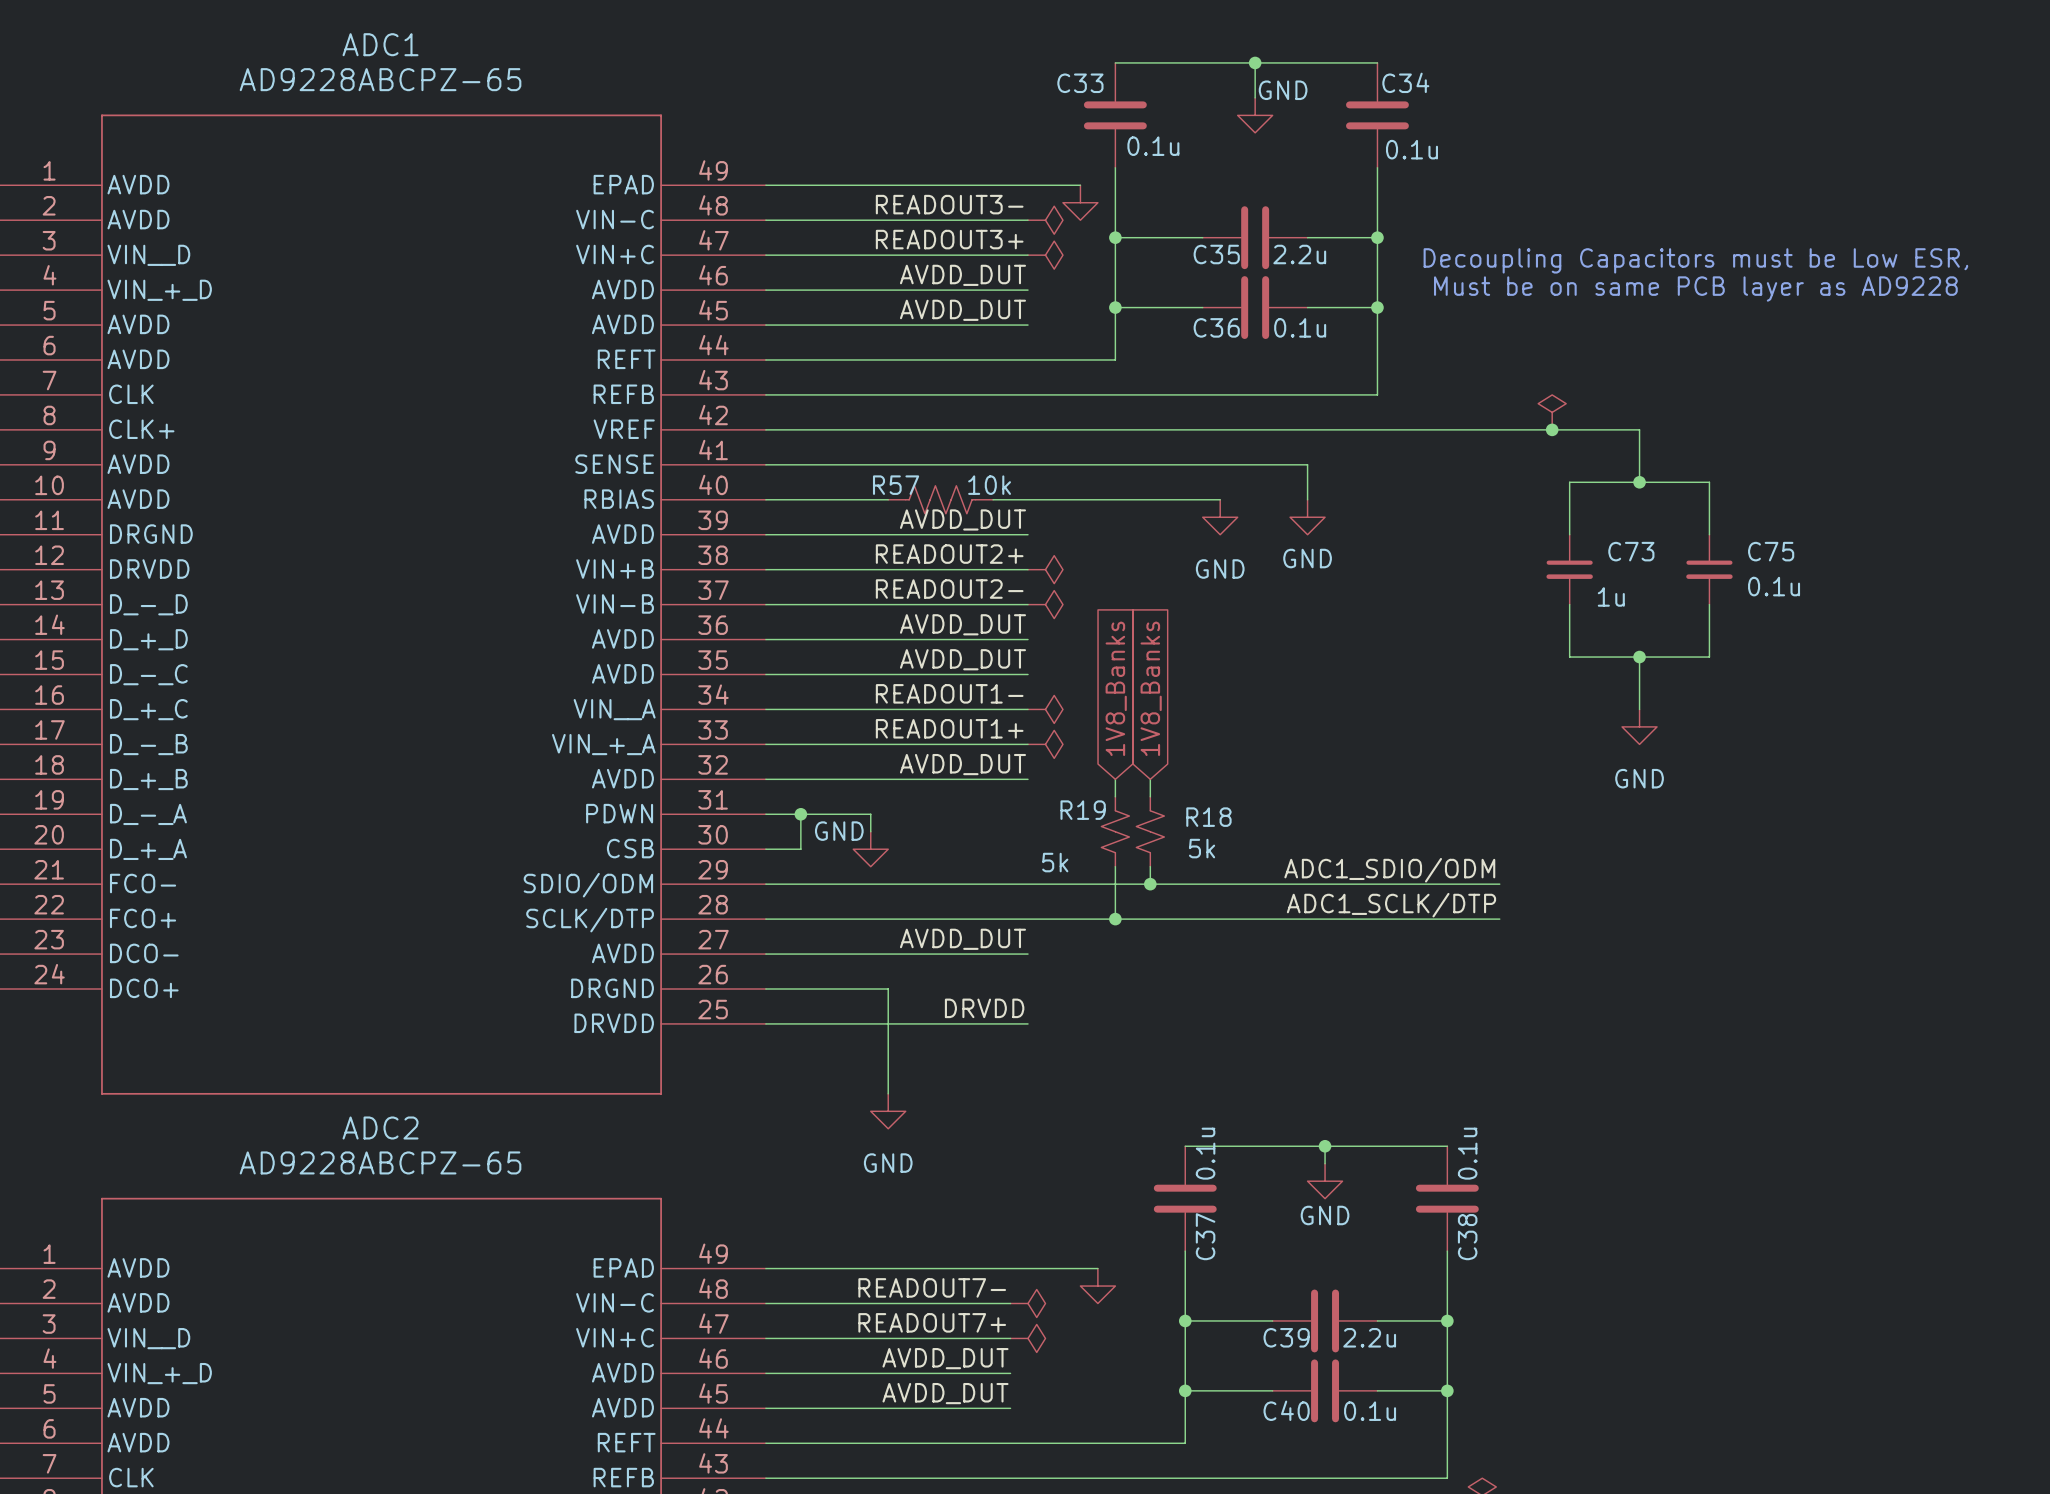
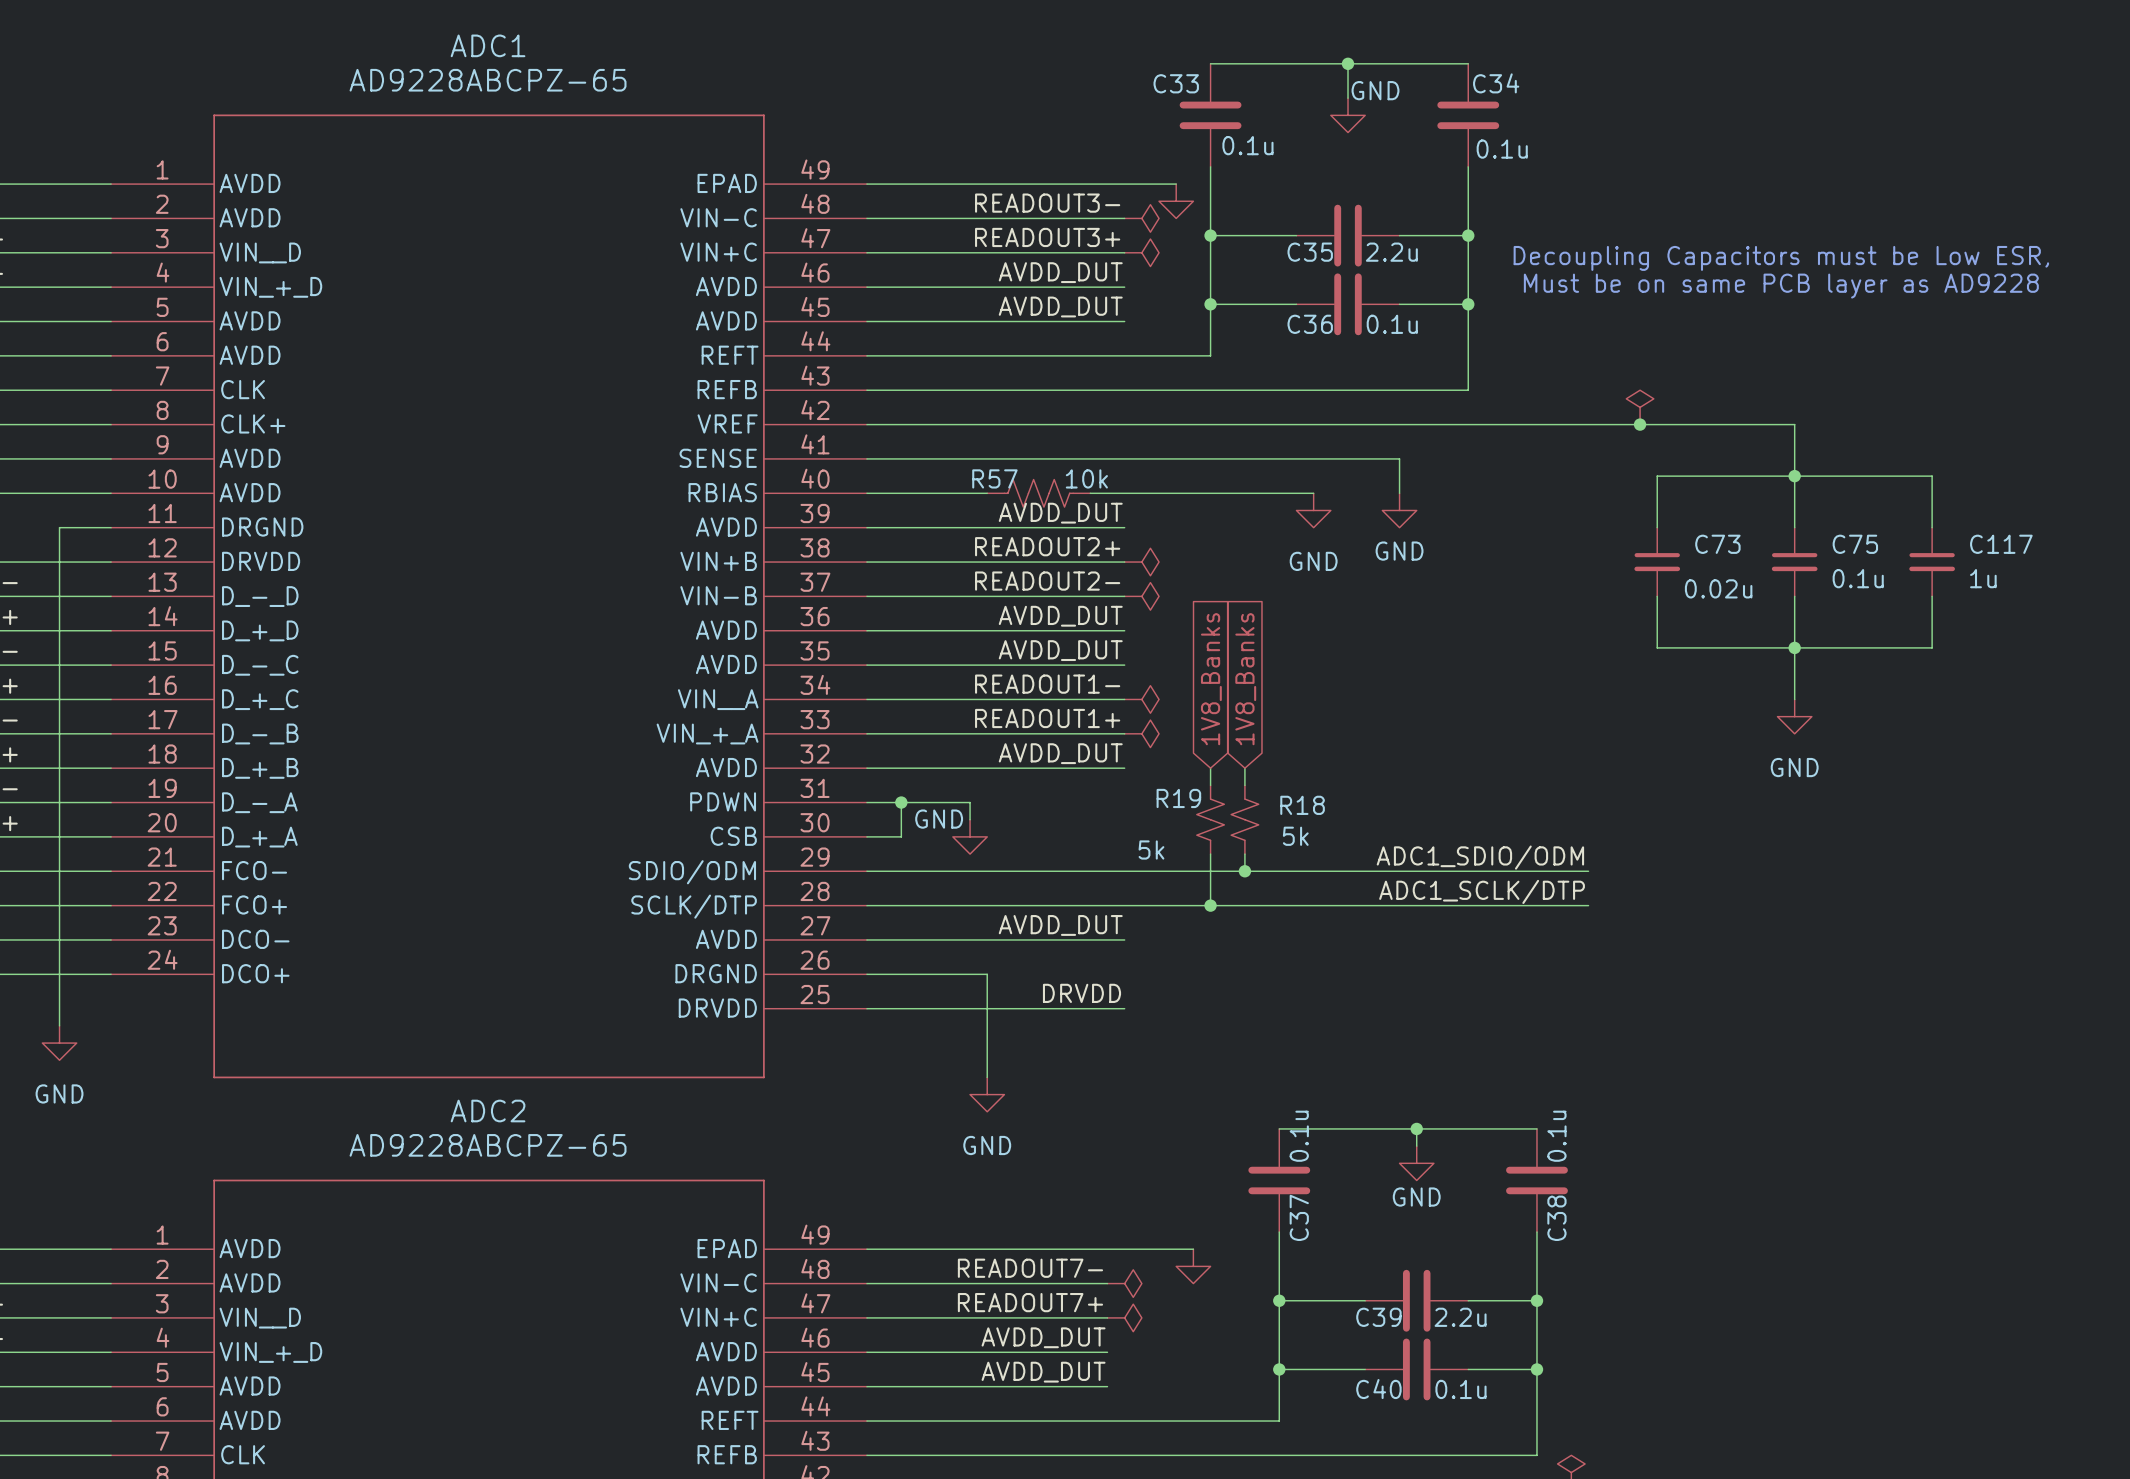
wire: (1639, 429) (1639, 482) -> (1725, 424) (1794, 424) (1794, 476) (1932, 476) (1932, 527)
junction position: (1639, 482) -> (1794, 476)
C117: none -> 1u (1932, 562)
C73 value: 1u (1611, 596) -> 0.02u (1718, 588)
wire: none -> (1932, 596) (1932, 647) (1794, 647) (1794, 699)
wire: (1639, 657) (1639, 709) -> none
junction position: (1639, 657) -> (1794, 647)
power symbol position: GND (1639, 726) -> GND (1794, 716)

